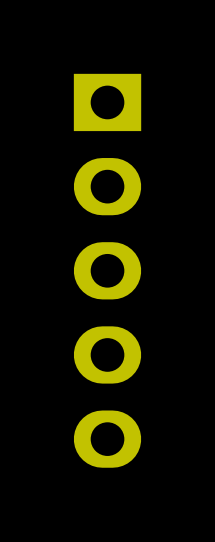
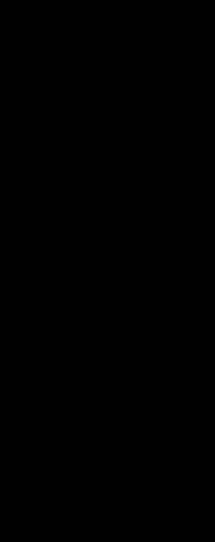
part: (107, 270) -> none

